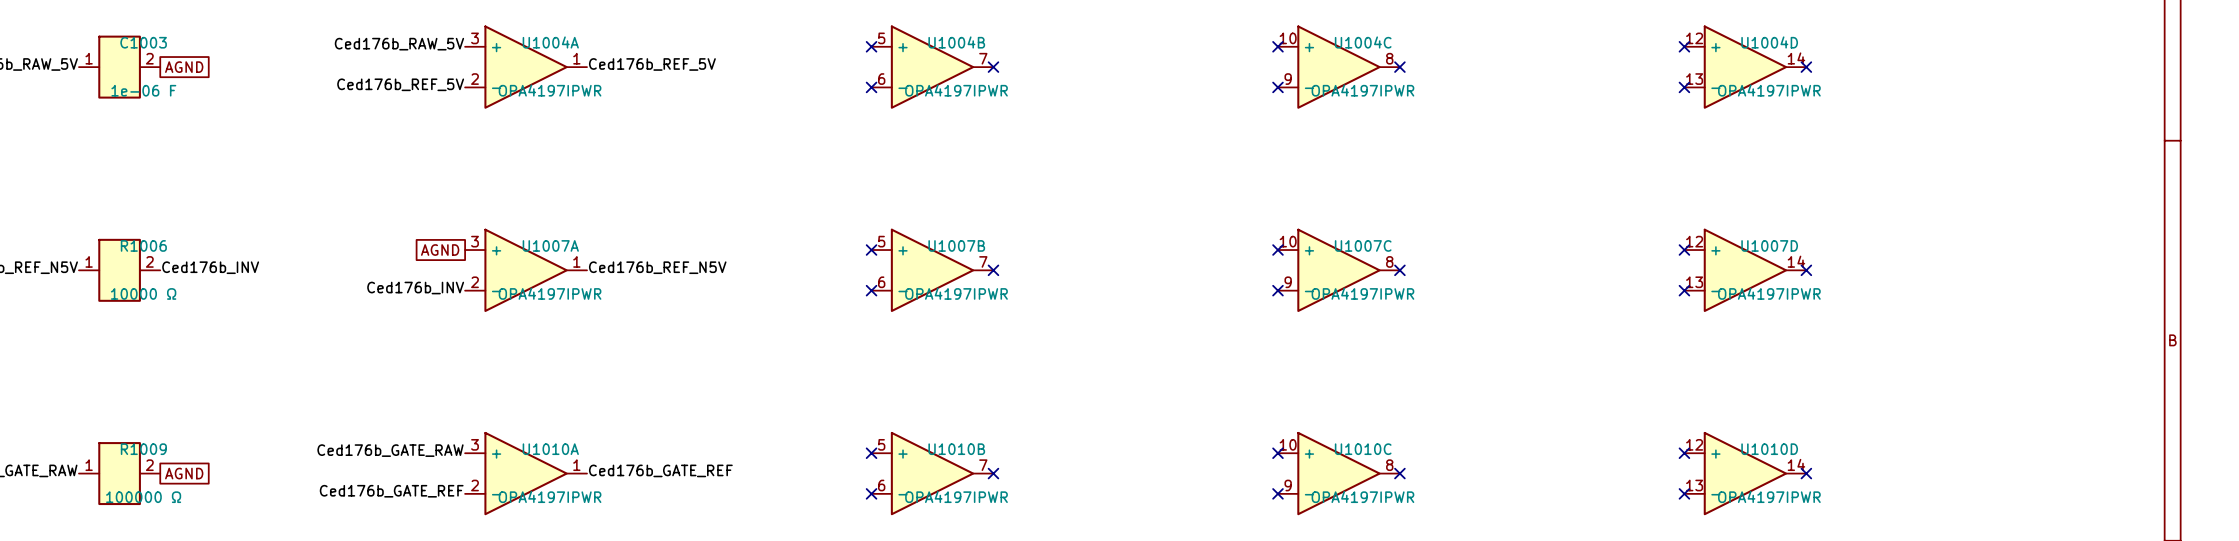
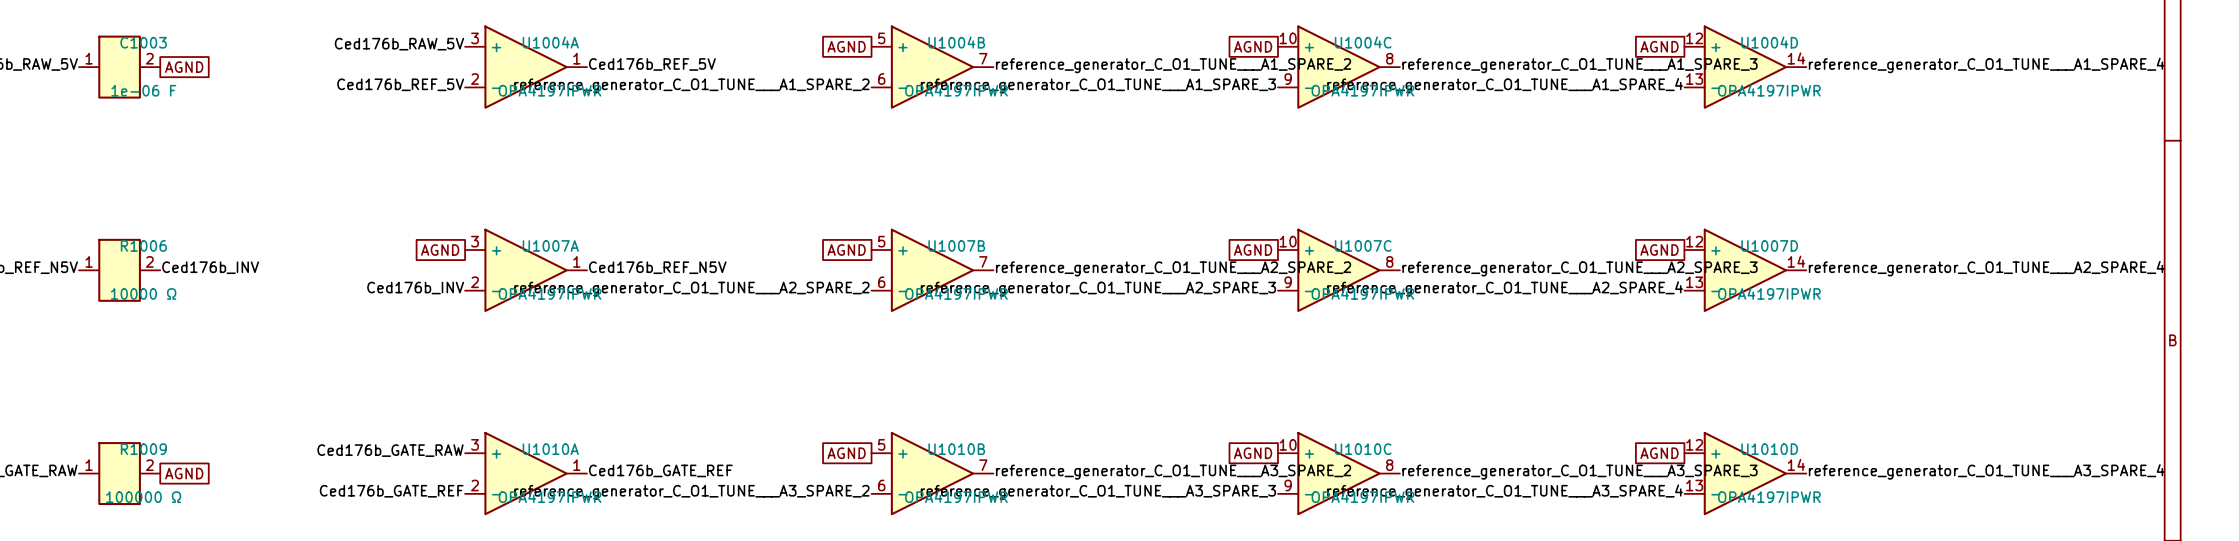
global label: none -> AGND (846, 46)
no-connect mark: (871, 46) -> none
global label: none -> AGND (1253, 46)
no-connect mark: (1277, 46) -> none
global label: none -> AGND (1659, 46)
no-connect mark: (1684, 46) -> none
label: none -> reference_generator_C_O1_TUNE___A1_SPARE_2 (1173, 65)
label: none -> reference_generator_C_O1_TUNE___A1_SPARE_3 (1579, 65)
label: none -> reference_generator_C_O1_TUNE___A1_SPARE_4 (1986, 65)
no-connect mark: (993, 67) -> none
no-connect mark: (1399, 67) -> none
no-connect mark: (1806, 67) -> none
label: none -> reference_generator_C_O1_TUNE___A1_SPARE_4 (1505, 85)
label: none -> reference_generator_C_O1_TUNE___A1_SPARE_2 (691, 86)
label: none -> reference_generator_C_O1_TUNE___A1_SPARE_3 (1098, 86)
no-connect mark: (871, 87) -> none
no-connect mark: (1277, 87) -> none
no-connect mark: (1684, 87) -> none
global label: none -> AGND (846, 250)
no-connect mark: (871, 250) -> none
global label: none -> AGND (1253, 250)
no-connect mark: (1277, 250) -> none
global label: none -> AGND (1659, 250)
no-connect mark: (1684, 250) -> none
label: none -> reference_generator_C_O1_TUNE___A2_SPARE_2 (1173, 268)
label: none -> reference_generator_C_O1_TUNE___A2_SPARE_3 (1579, 268)
label: none -> reference_generator_C_O1_TUNE___A2_SPARE_4 (1986, 268)
no-connect mark: (993, 270) -> none
no-connect mark: (1399, 270) -> none
no-connect mark: (1806, 270) -> none
label: none -> reference_generator_C_O1_TUNE___A2_SPARE_4 (1505, 288)
label: none -> reference_generator_C_O1_TUNE___A2_SPARE_2 (691, 289)
label: none -> reference_generator_C_O1_TUNE___A2_SPARE_3 (1098, 289)
no-connect mark: (871, 290) -> none
no-connect mark: (1277, 290) -> none
no-connect mark: (1684, 290) -> none
global label: none -> AGND (846, 453)
no-connect mark: (871, 453) -> none
global label: none -> AGND (1253, 453)
no-connect mark: (1277, 453) -> none
global label: none -> AGND (1659, 453)
no-connect mark: (1684, 453) -> none
label: none -> reference_generator_C_O1_TUNE___A3_SPARE_4 (1986, 471)
label: none -> reference_generator_C_O1_TUNE___A3_SPARE_2 (1173, 472)
label: none -> reference_generator_C_O1_TUNE___A3_SPARE_3 (1579, 472)
no-connect mark: (993, 473) -> none
no-connect mark: (1399, 473) -> none
no-connect mark: (1806, 473) -> none
label: none -> reference_generator_C_O1_TUNE___A3_SPARE_2 (691, 492)
label: none -> reference_generator_C_O1_TUNE___A3_SPARE_3 (1098, 492)
label: none -> reference_generator_C_O1_TUNE___A3_SPARE_4 (1505, 492)
no-connect mark: (871, 493) -> none
no-connect mark: (1277, 493) -> none
no-connect mark: (1684, 493) -> none

